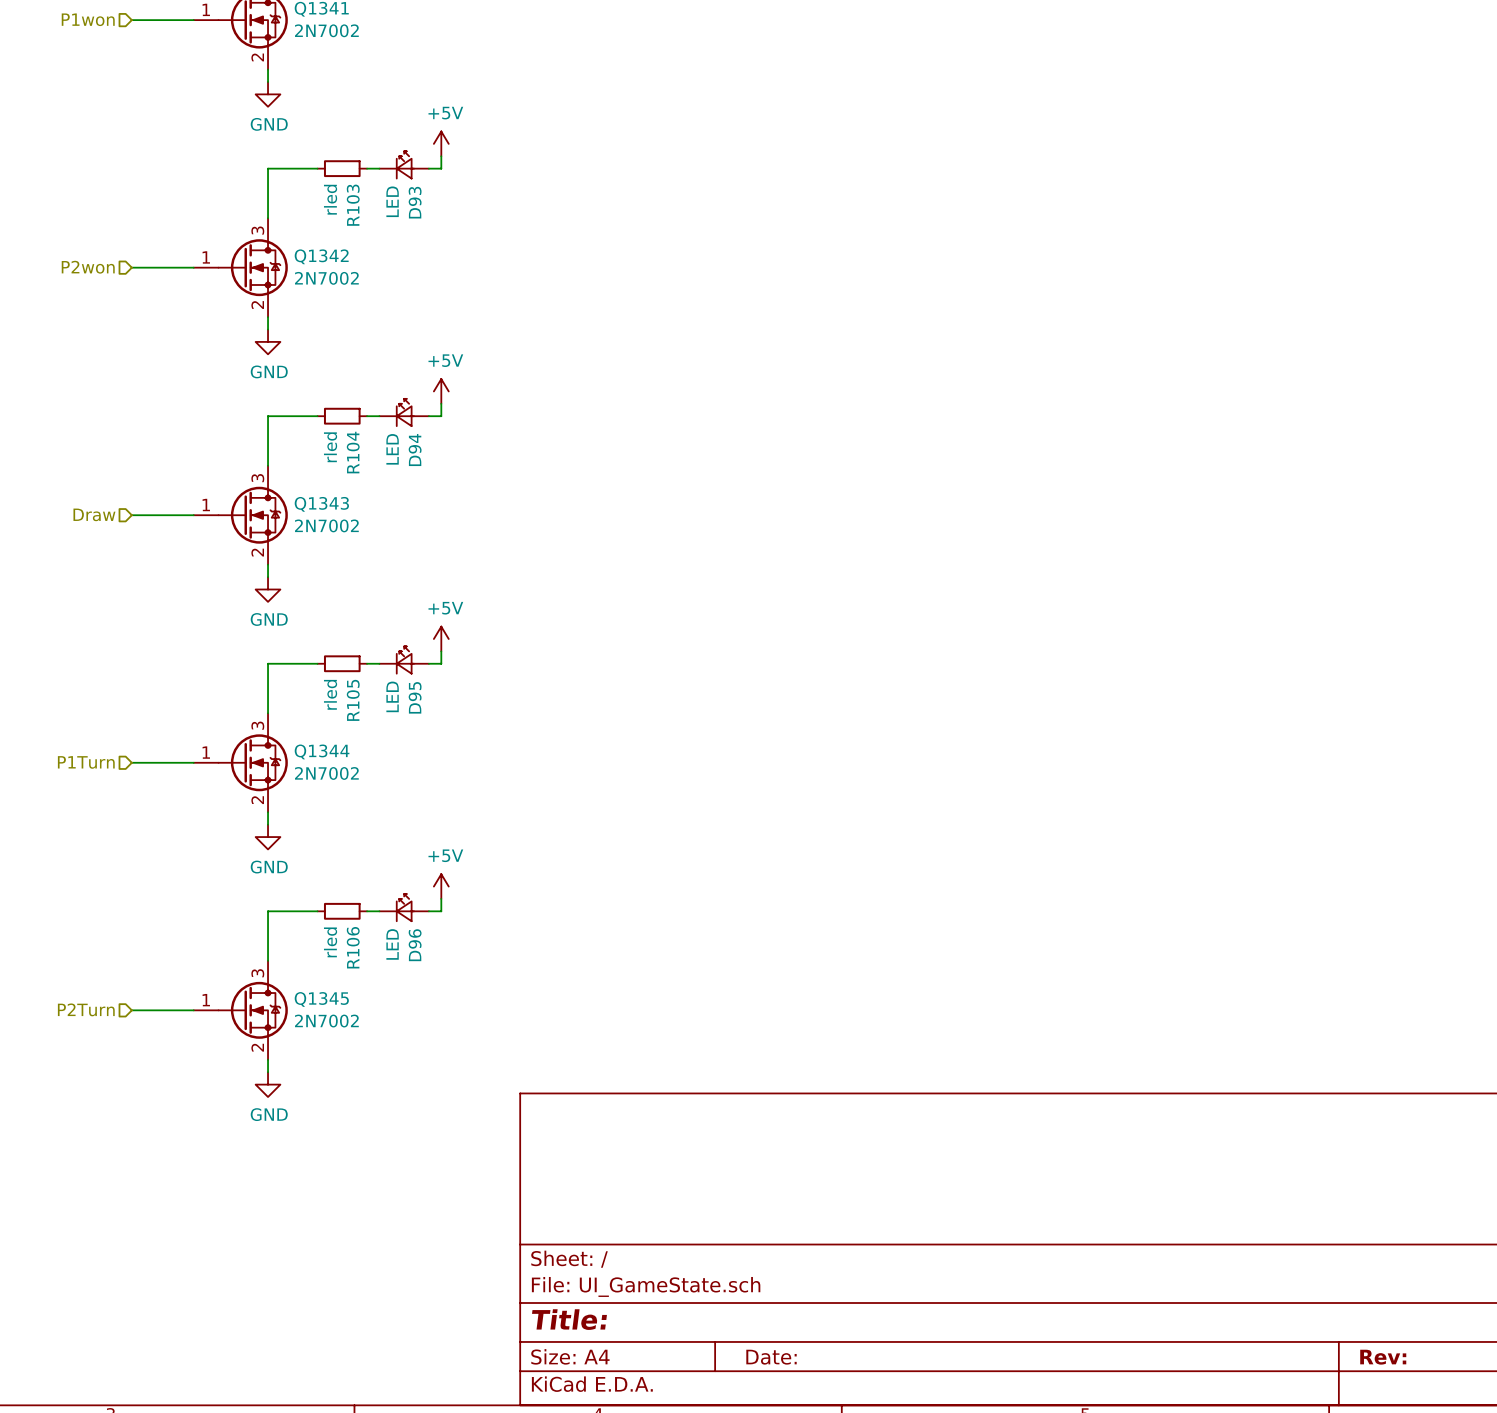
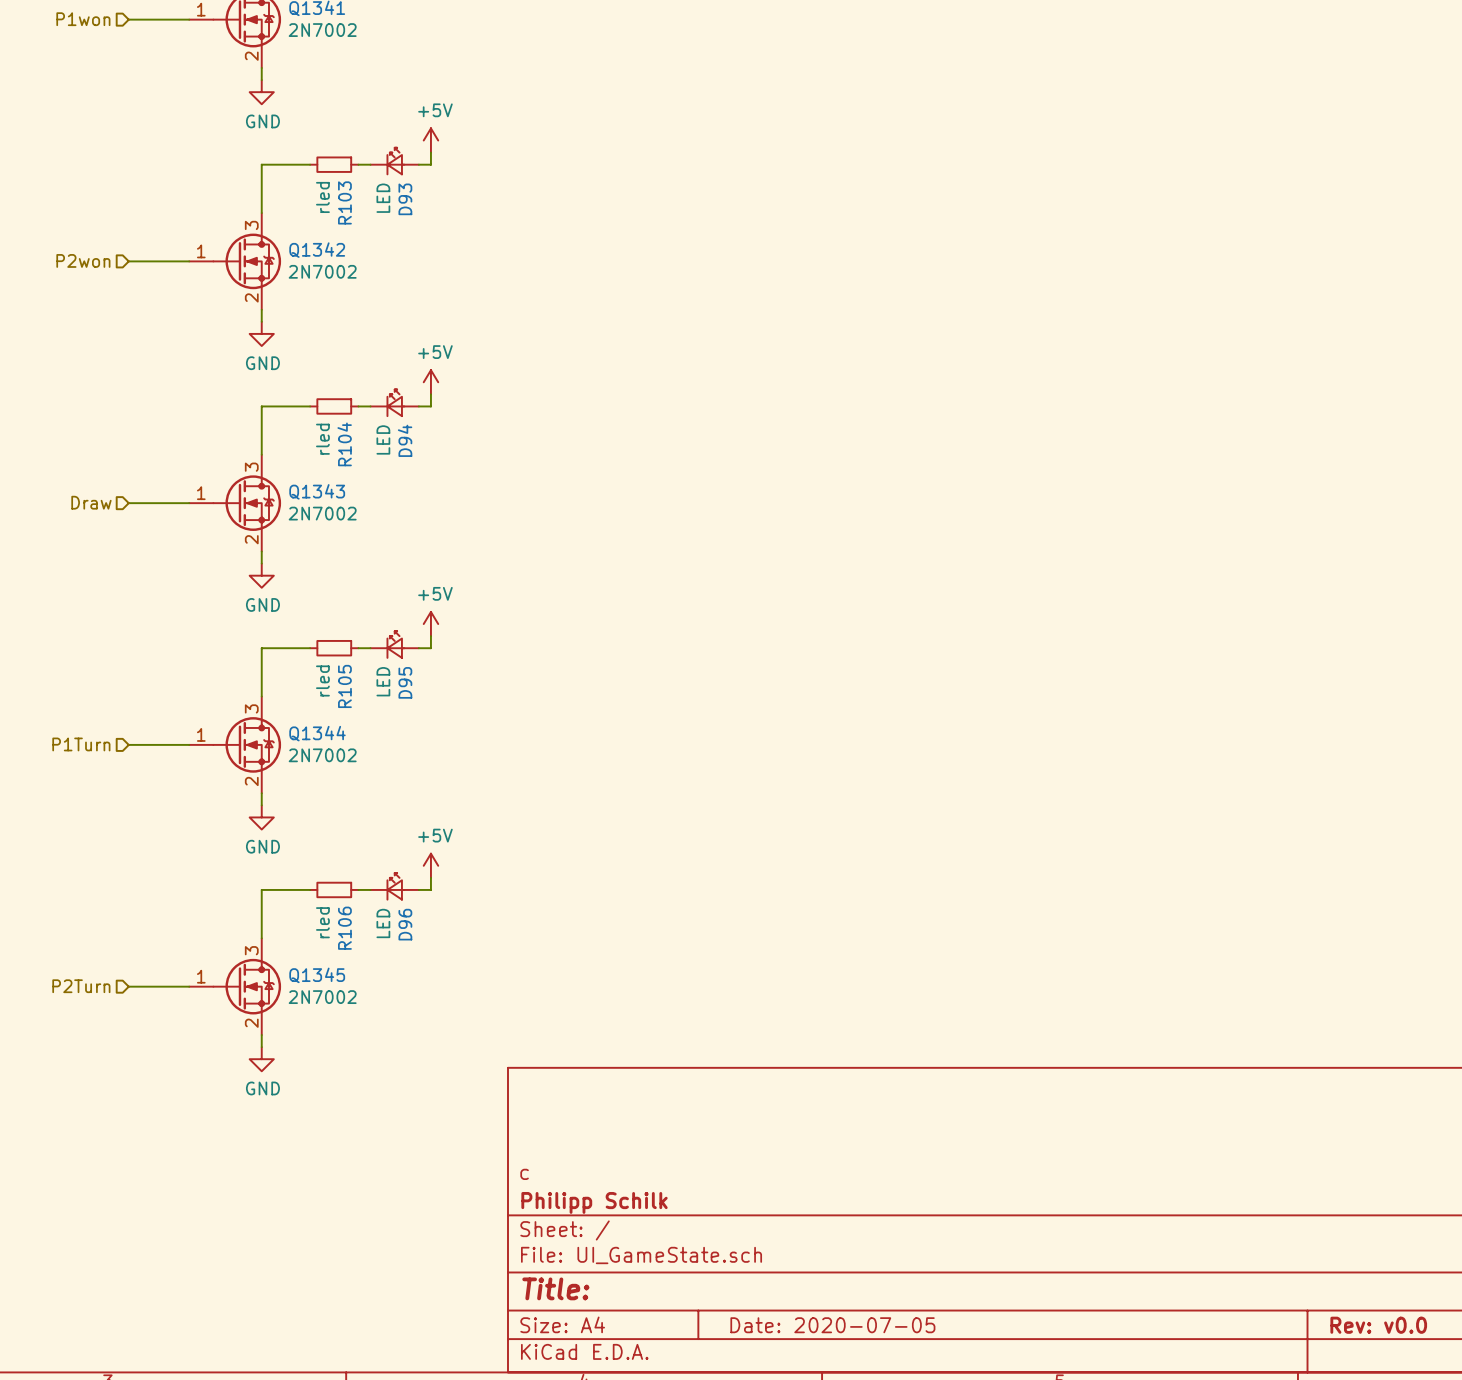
title block: none -> c (524, 1174)
title block: none -> Philipp Schilk (594, 1202)
title block: Date: (771, 1357) -> Date: 2020-07-05 (832, 1325)
title block: Rev: (1383, 1357) -> Rev: v0.0 (1378, 1325)

